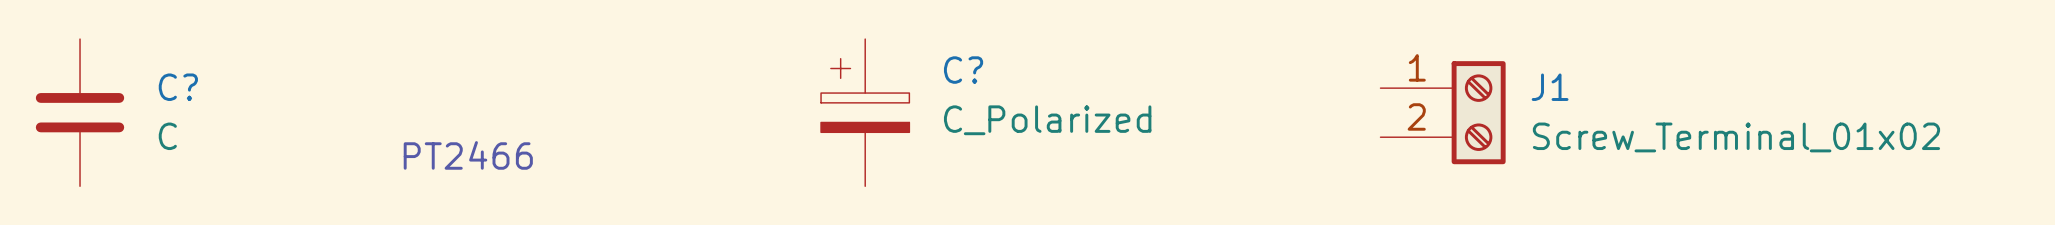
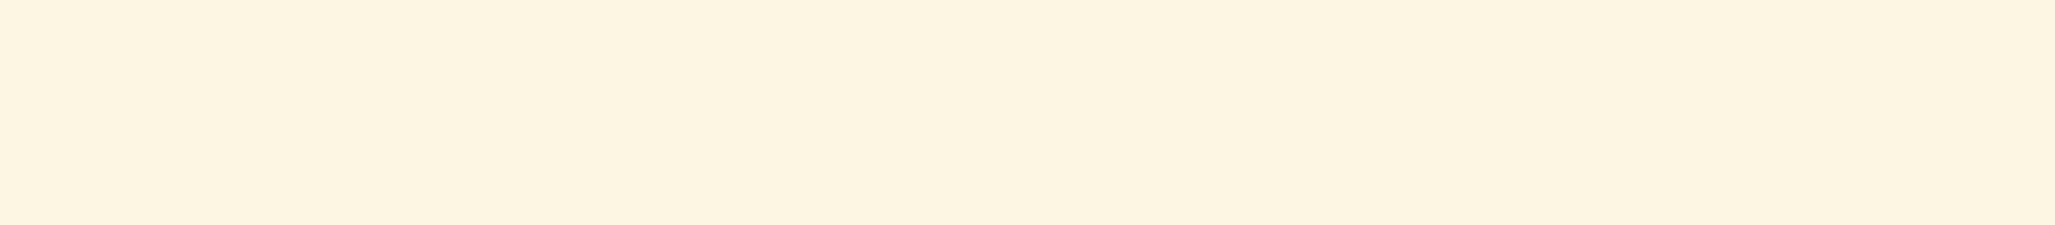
C?: C (80, 112) -> none
C?: C_Polarized (865, 112) -> none
J1: Screw_Terminal_01x02 (1443, 112) -> none
text: PT2466 (468, 155) -> none

